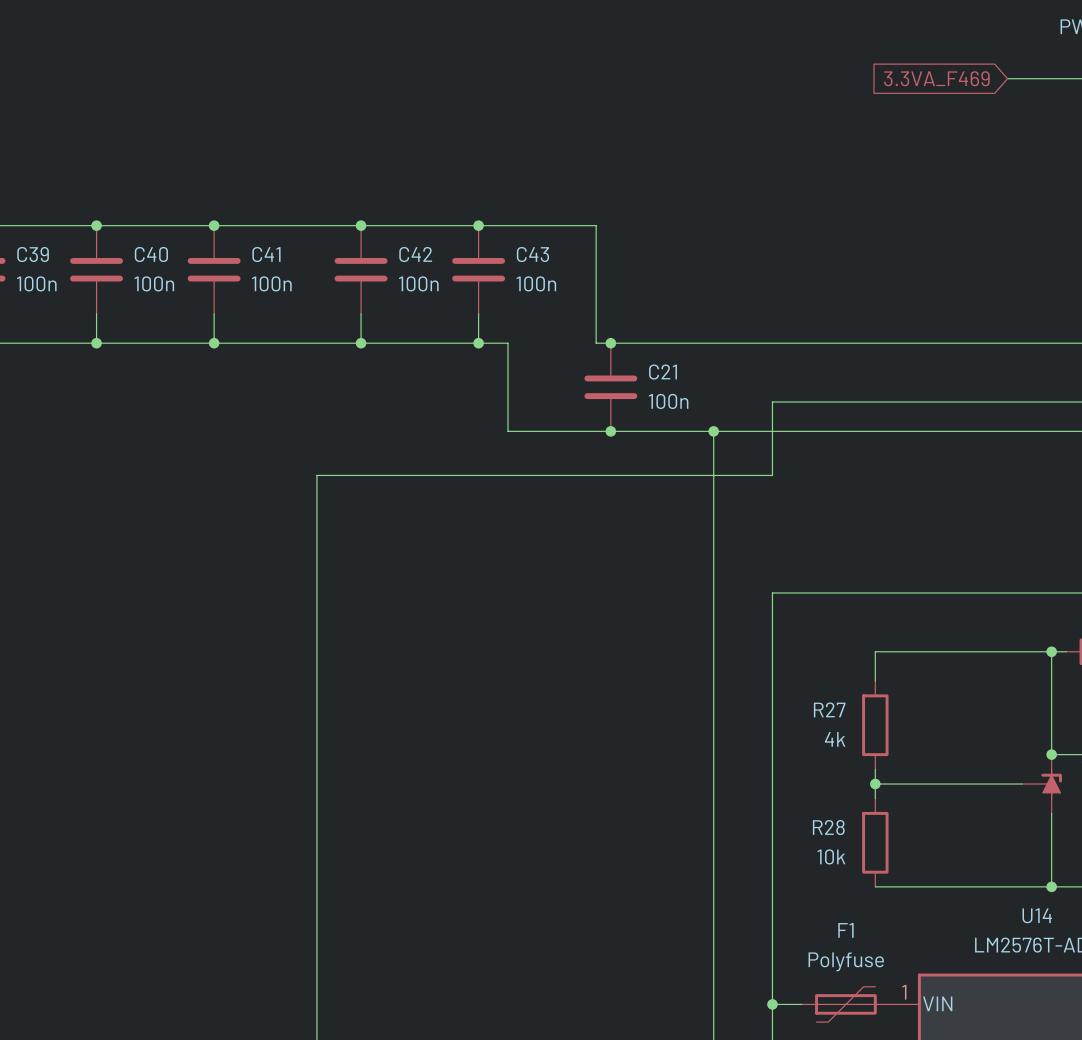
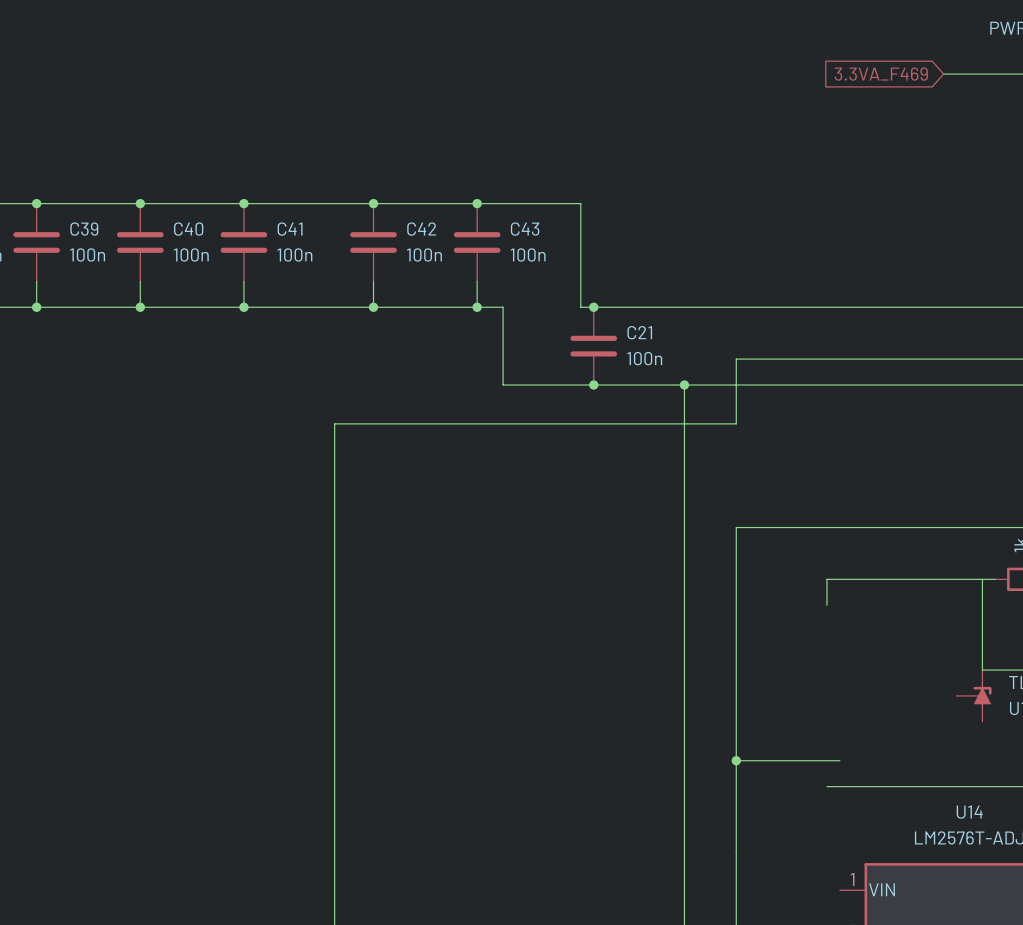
junction: (1051, 651) -> none
R27: 4k (875, 725) -> none
junction: (1051, 754) -> none
wire: (875, 769) (875, 798) -> none
wire: (875, 784) (1022, 784) -> none
junction: (875, 784) -> none
wire: (1051, 813) (1051, 886) -> none
R28: 10k (875, 842) -> none
wire: none -> (736, 760) (839, 760)
junction: none -> (736, 760)
junction: (1051, 886) -> none
wire: (772, 1004) (801, 1004) -> none
junction: (772, 1004) -> none
F1: Polyfuse (845, 1004) -> none

